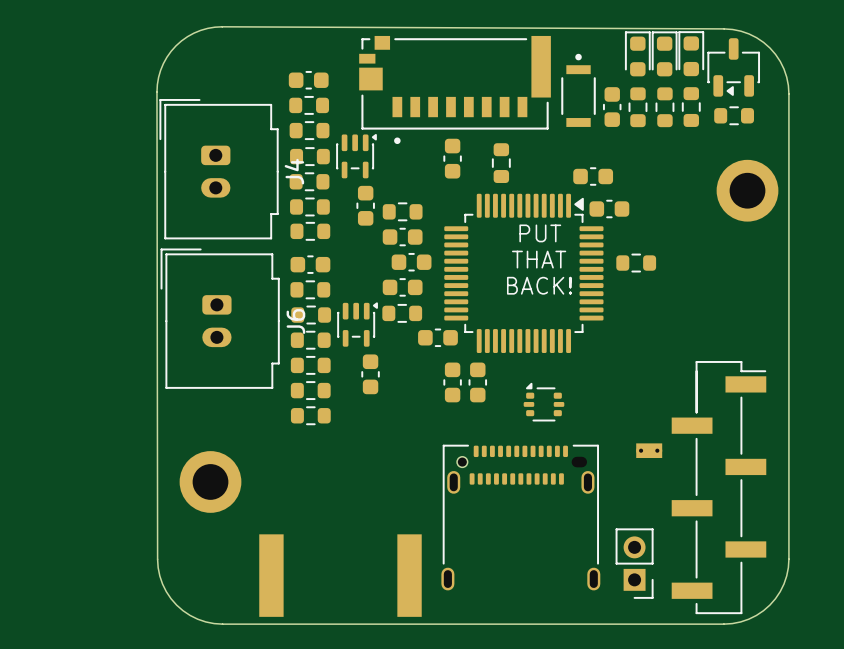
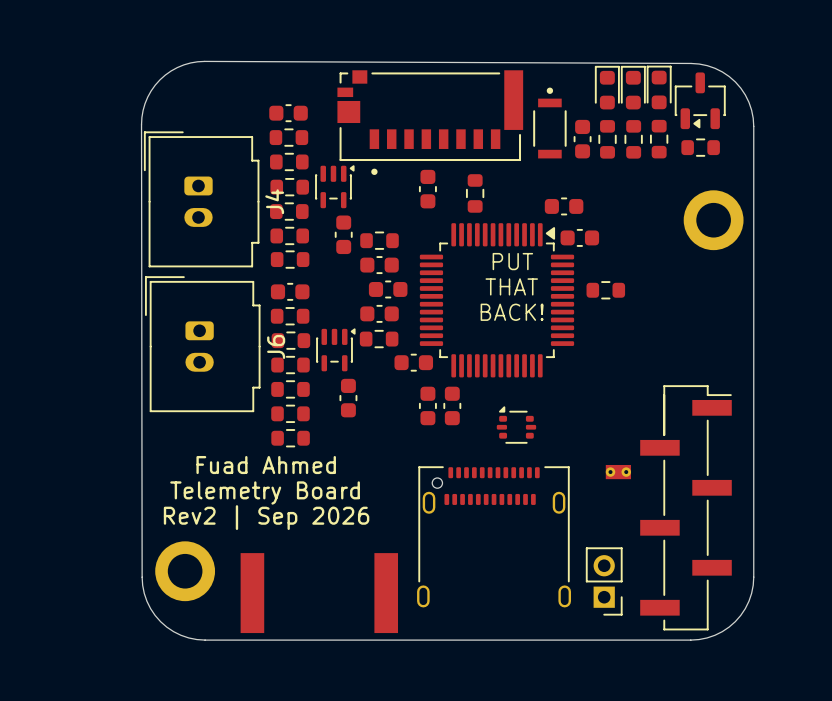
text: none -> Fuad Ahmed (266, 465)
text: none -> Telemetry Board (265, 492)
part position: (210, 481) -> (185, 571)
text: none -> Rev2 | Sep 2026 (266, 517)

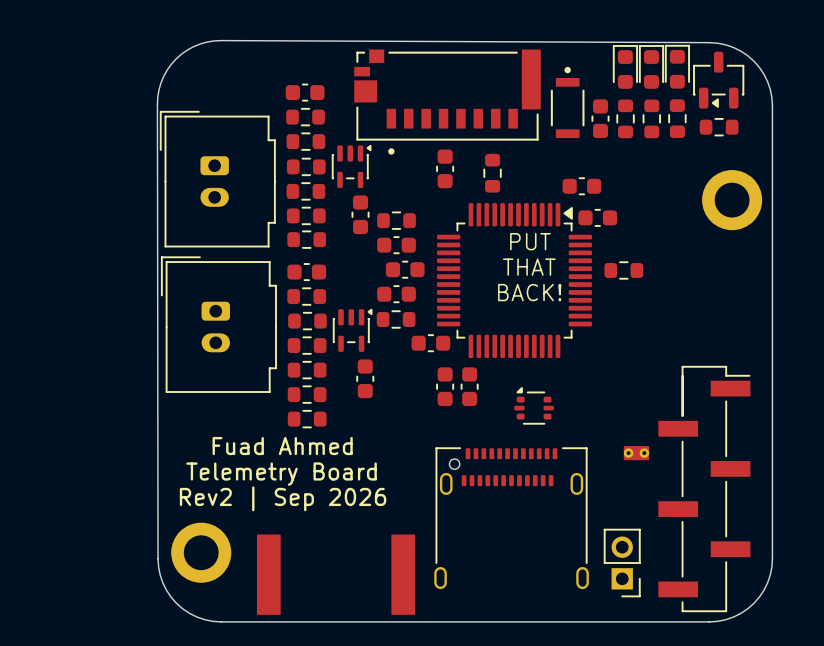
J4 name: J4 (274, 201) -> none
J6 name: J6 (276, 346) -> none

